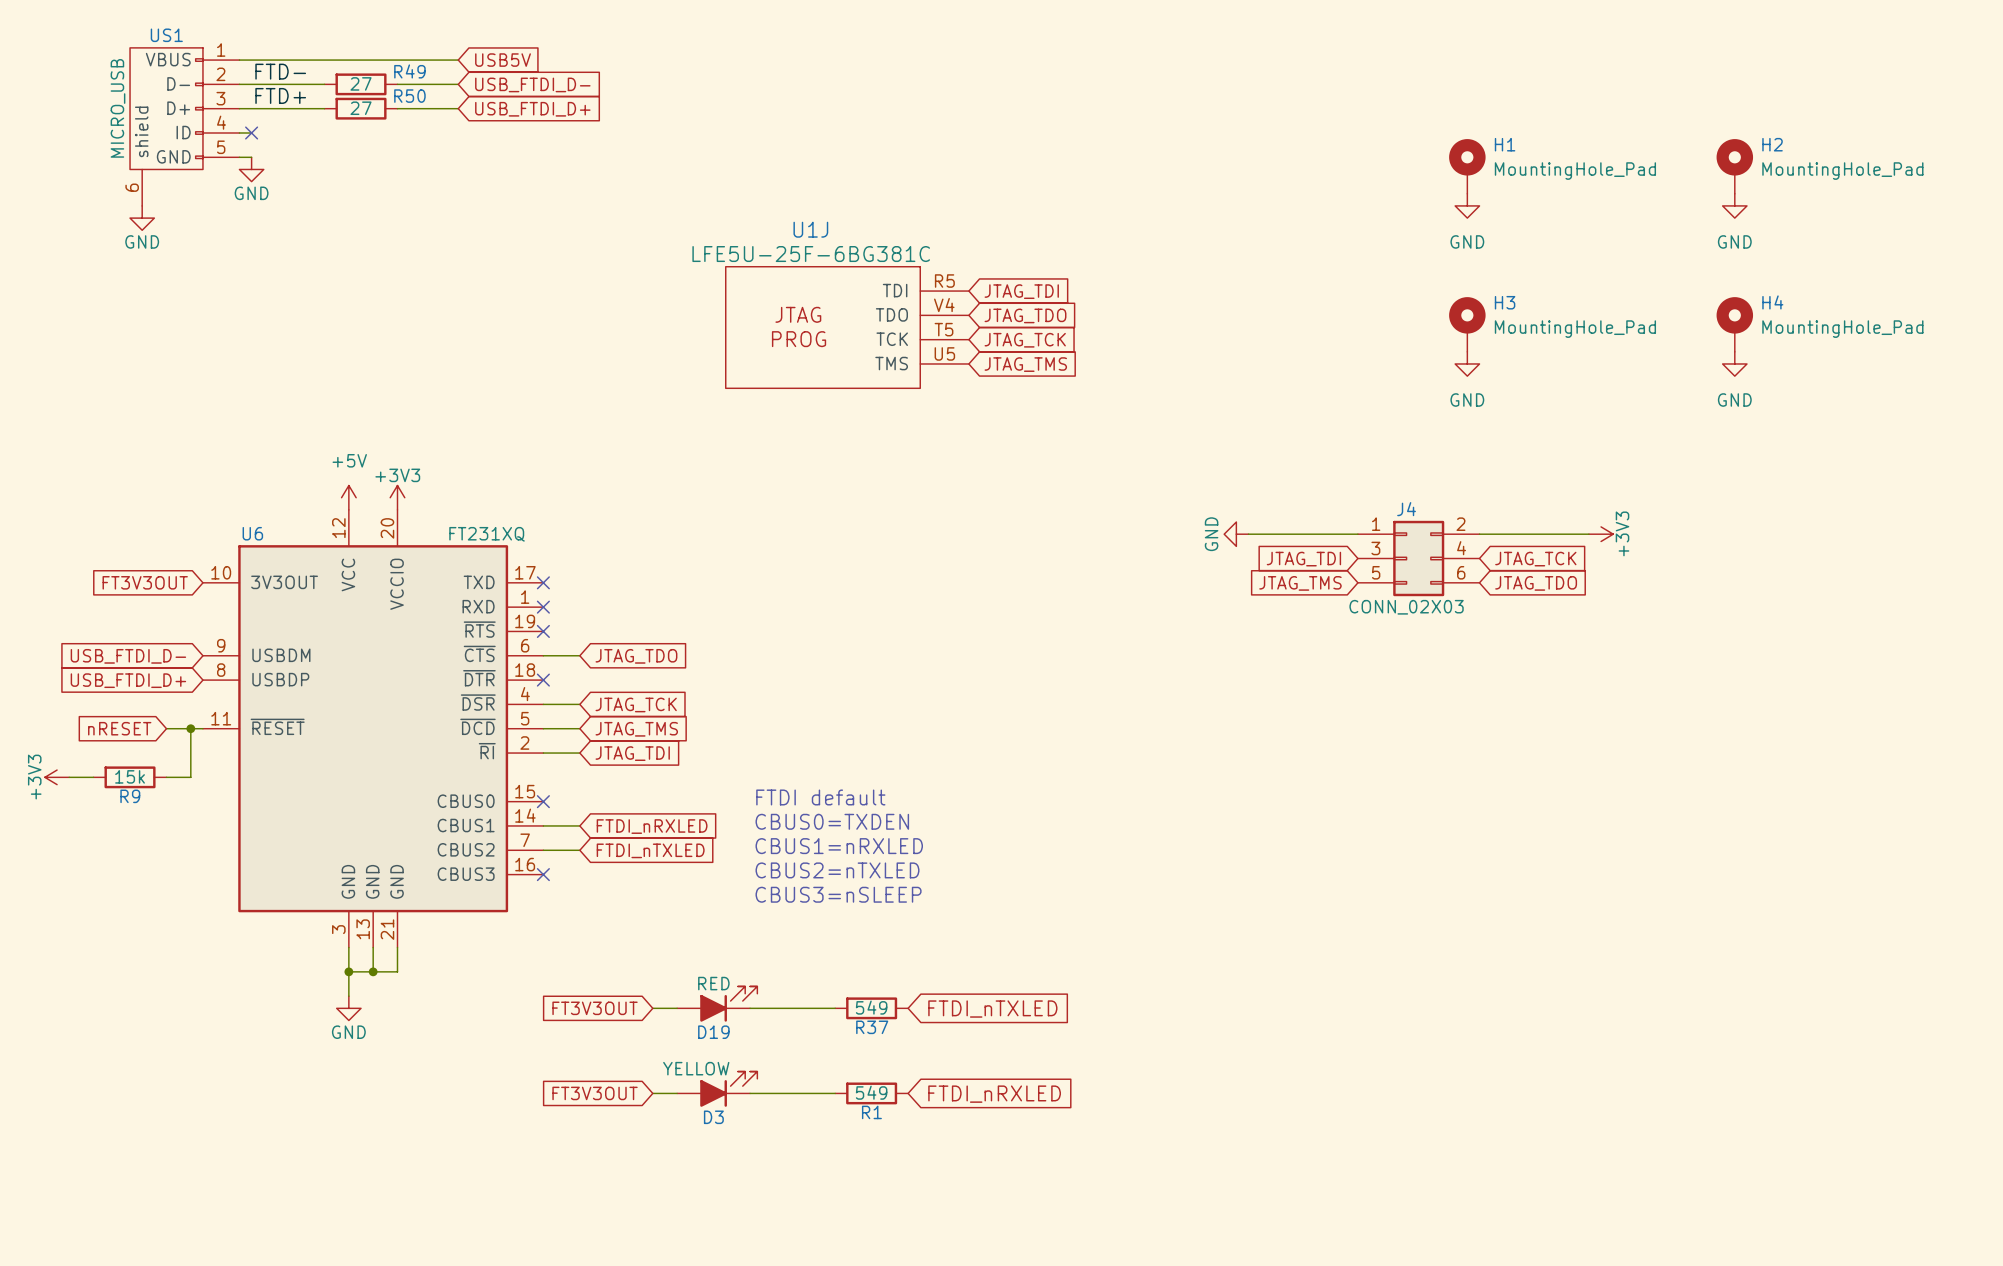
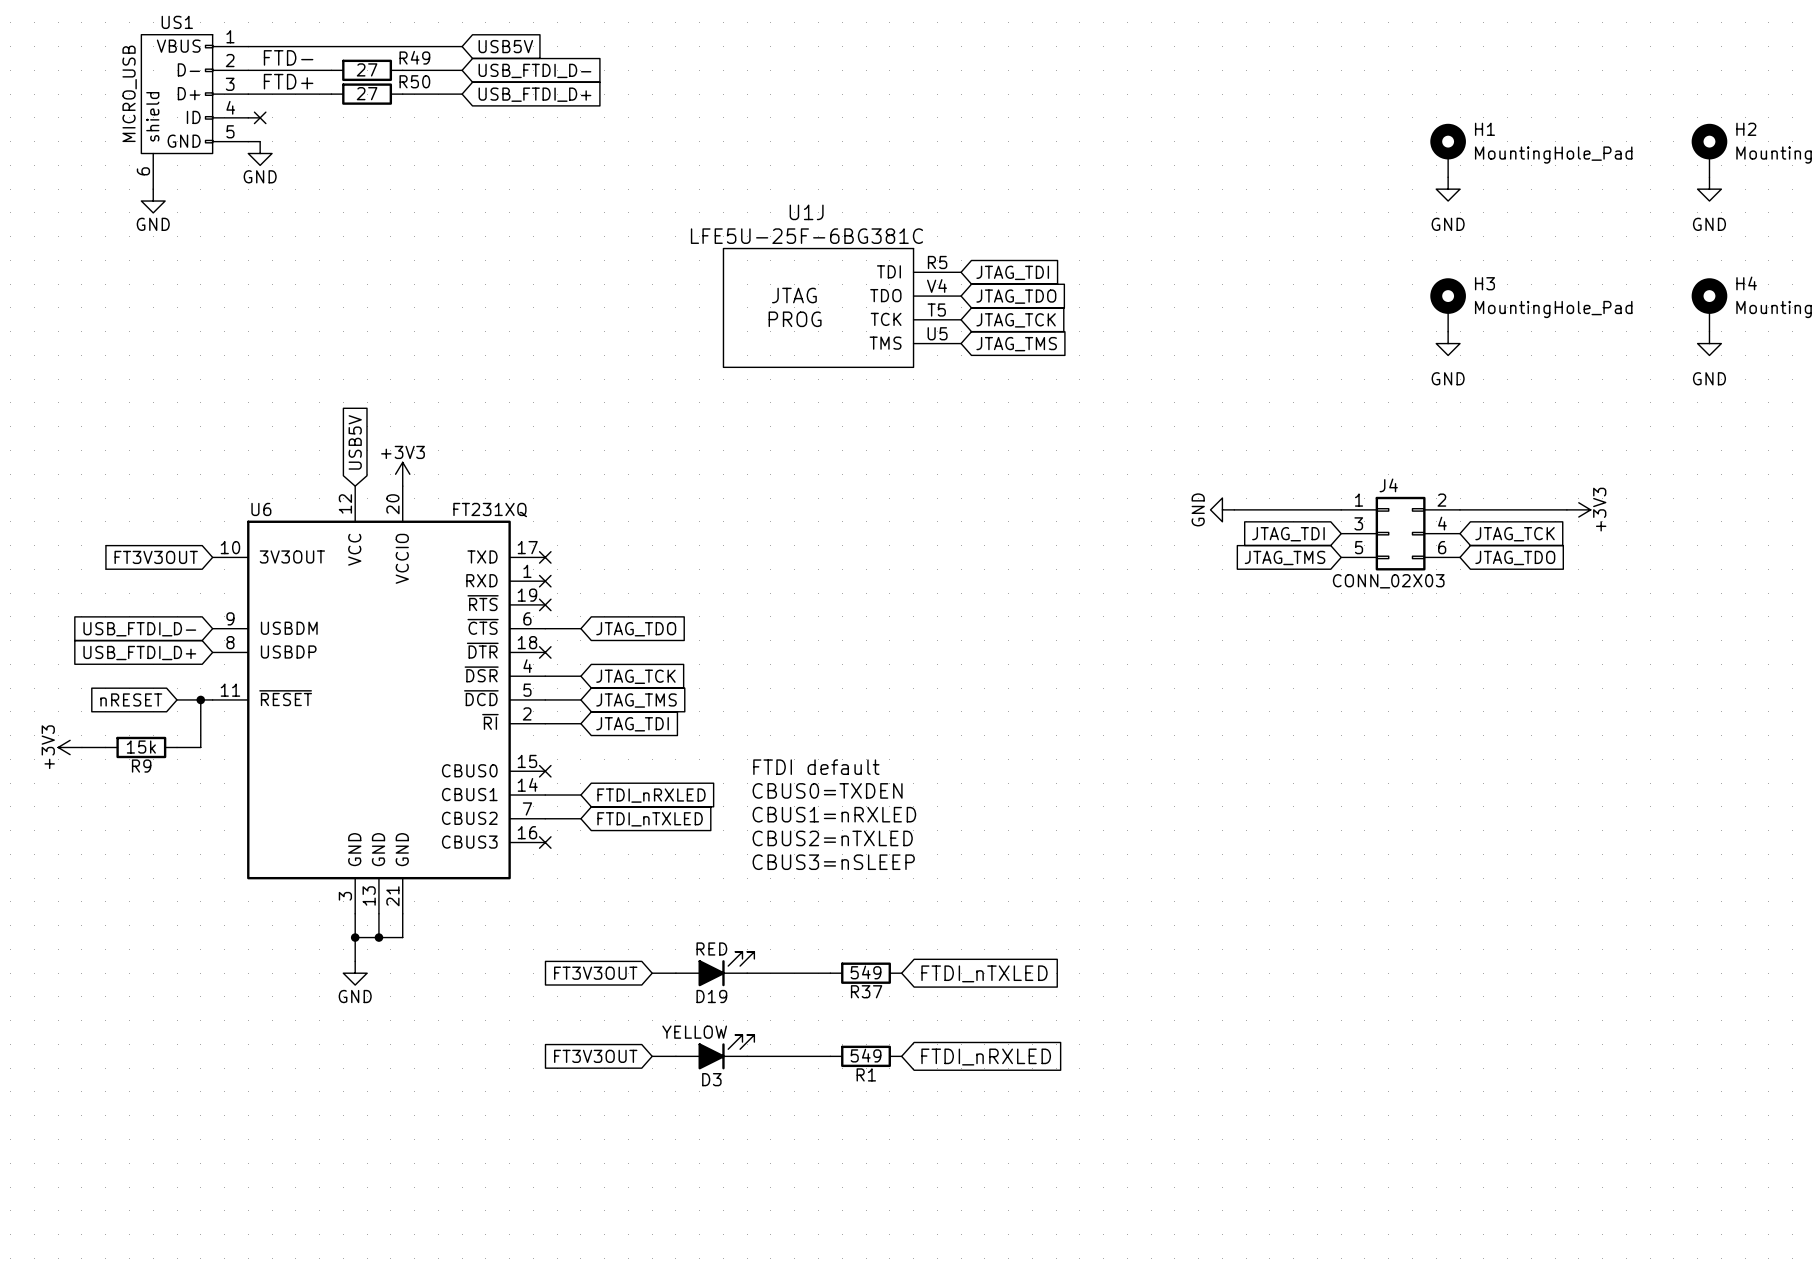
global label: none -> USB5V (355, 442)
power symbol: +5V (348, 497) -> none

